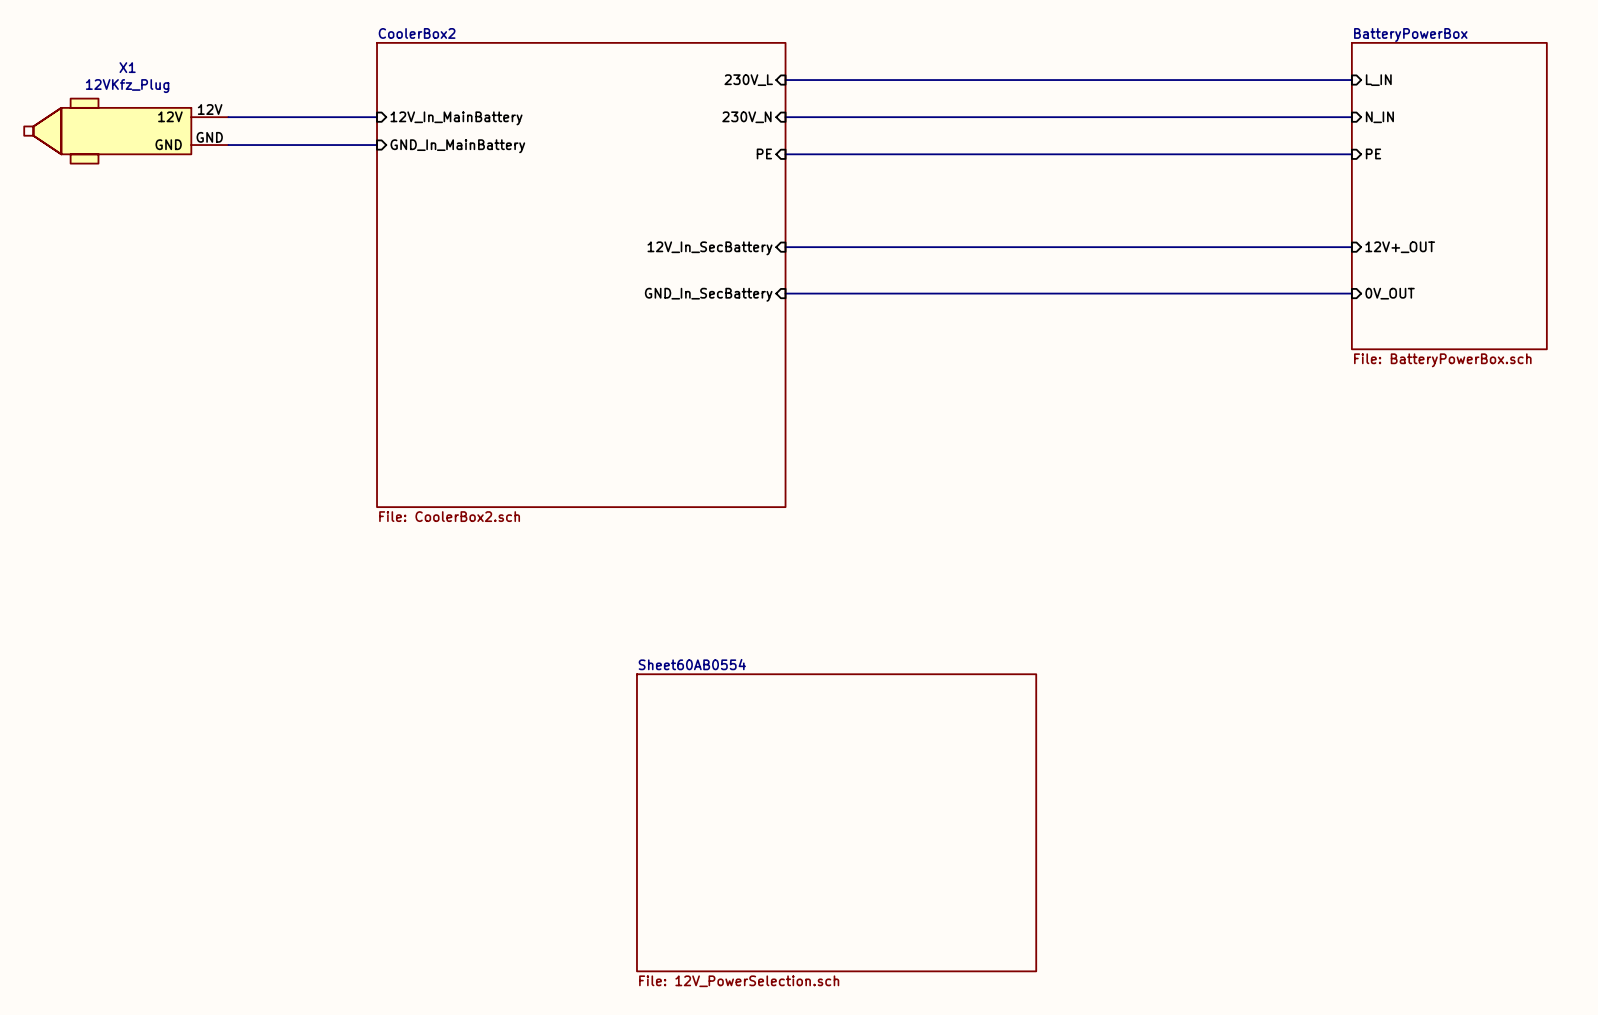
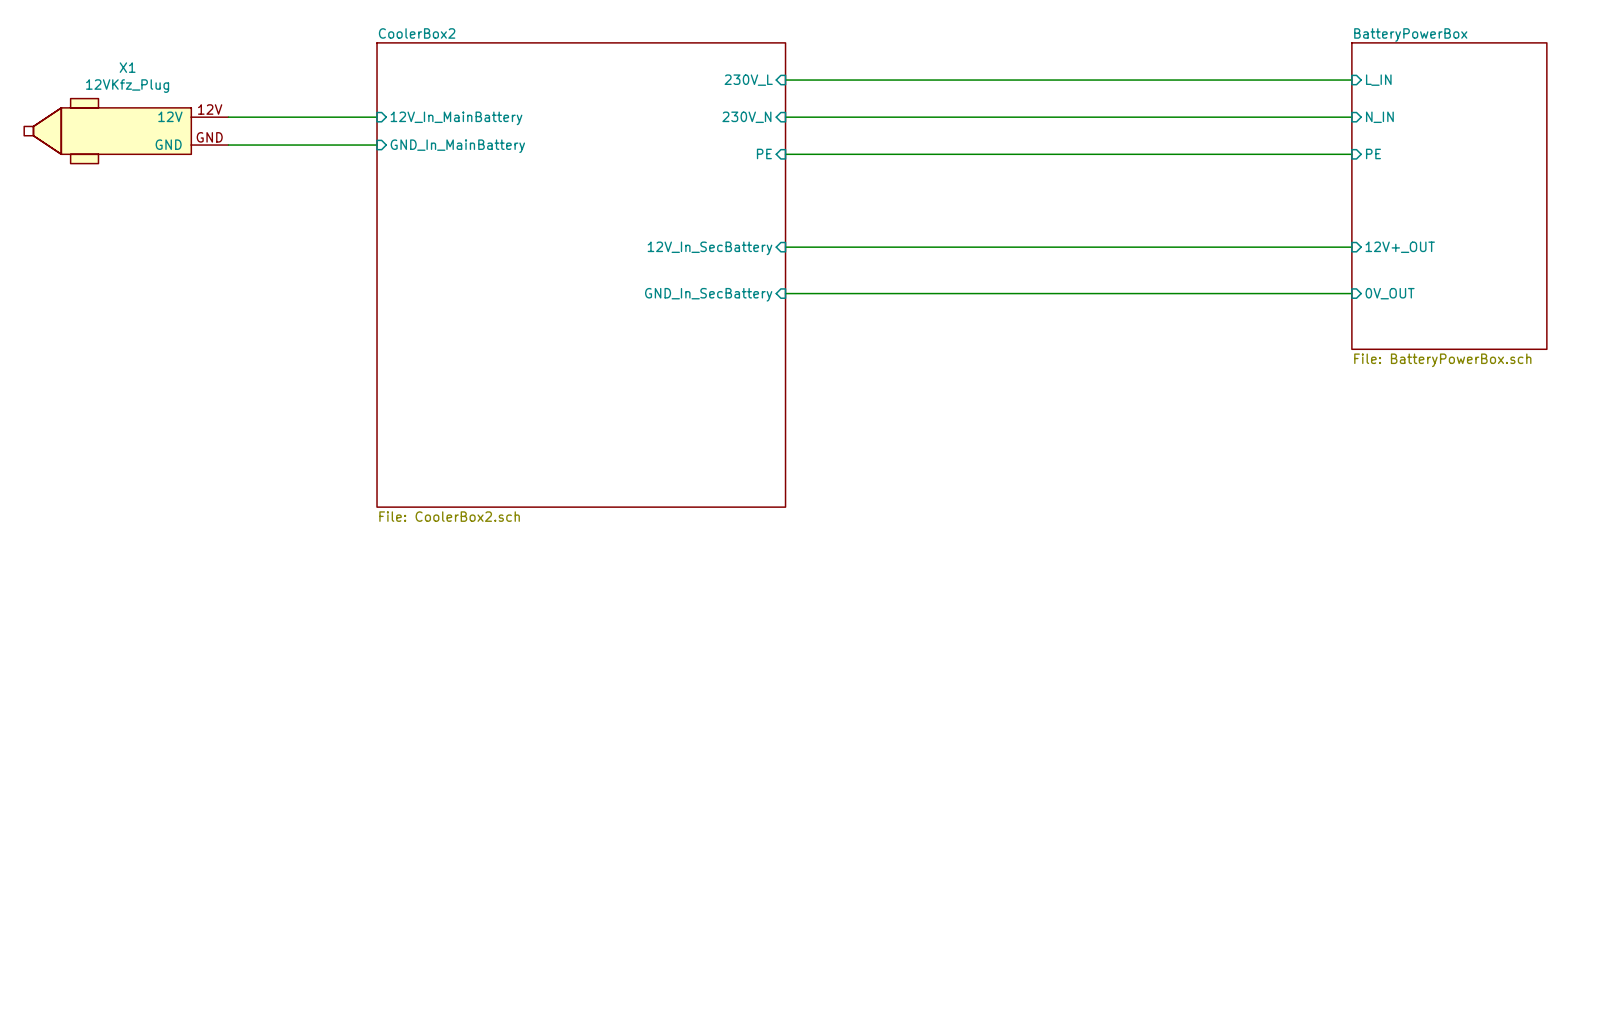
sheet Sheet60AB0554: File: 12V_PowerSelection.sch (836, 822) -> none

